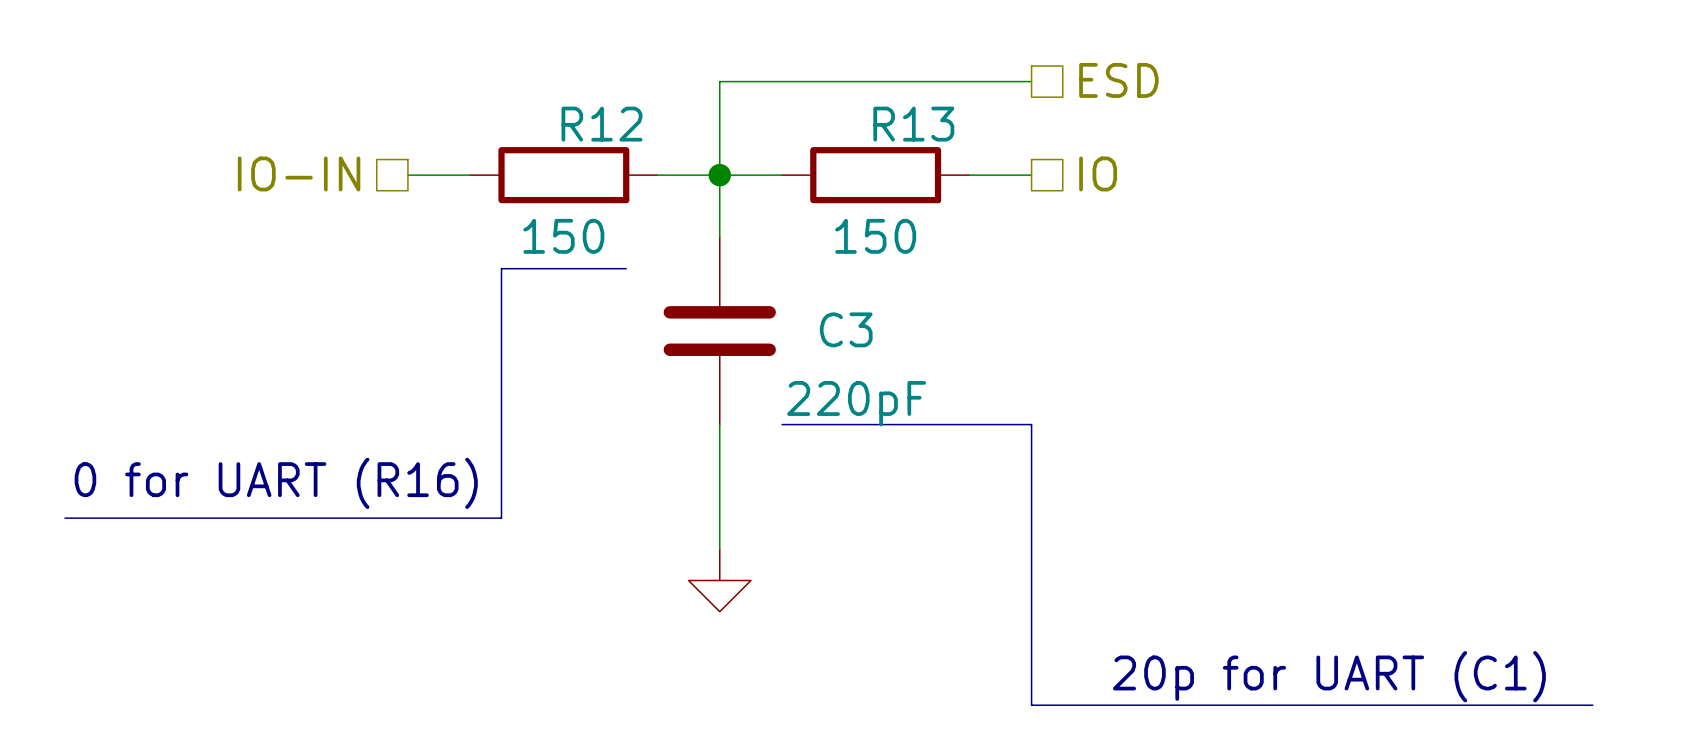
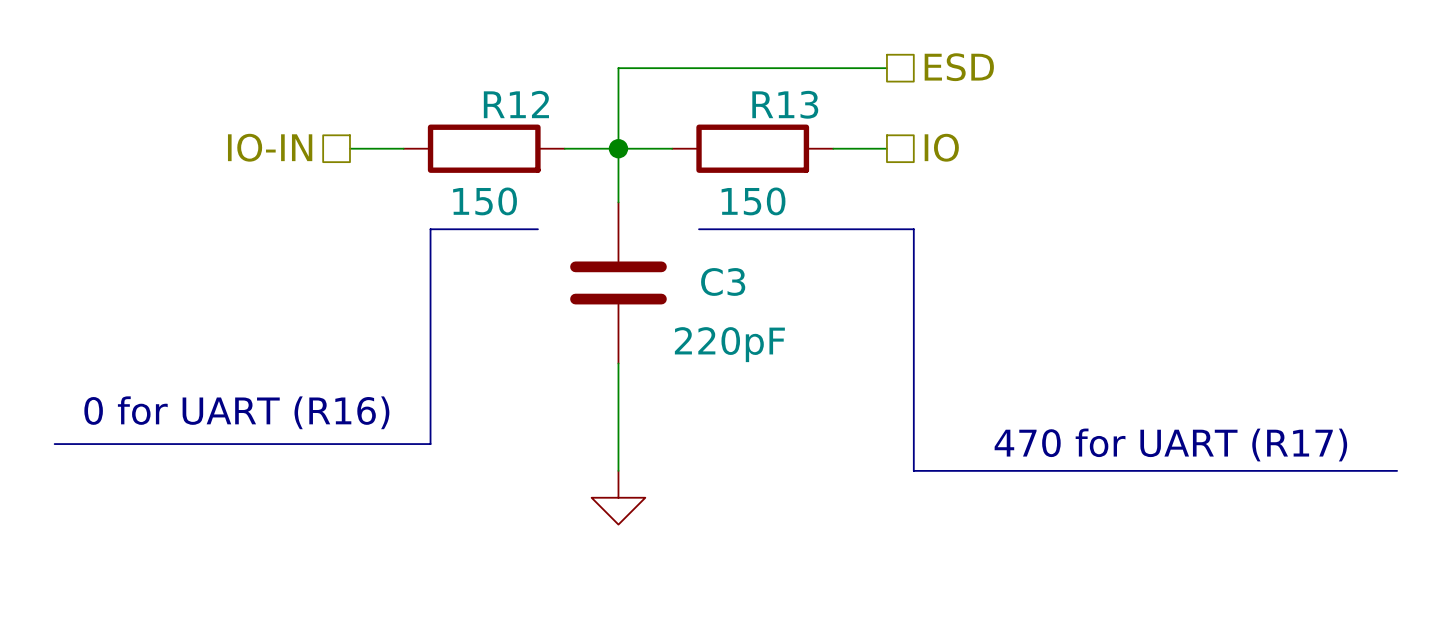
line: (782, 424) (1031, 424) (1031, 705) (1592, 705) -> (699, 229) (913, 229) (913, 470) (1397, 470)
text: none -> 470 for UART (R17) (1170, 444)
text: 20p for UART (C1) (1329, 676) -> none

